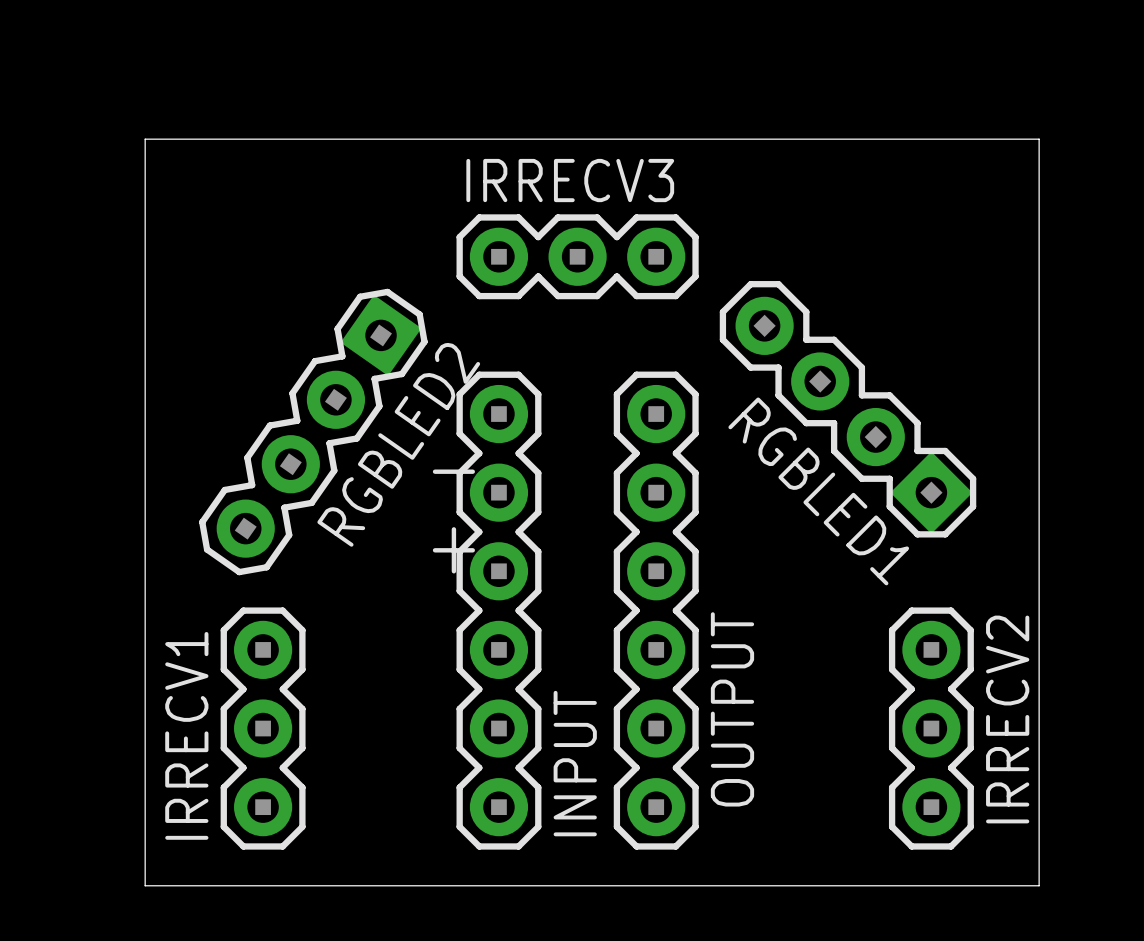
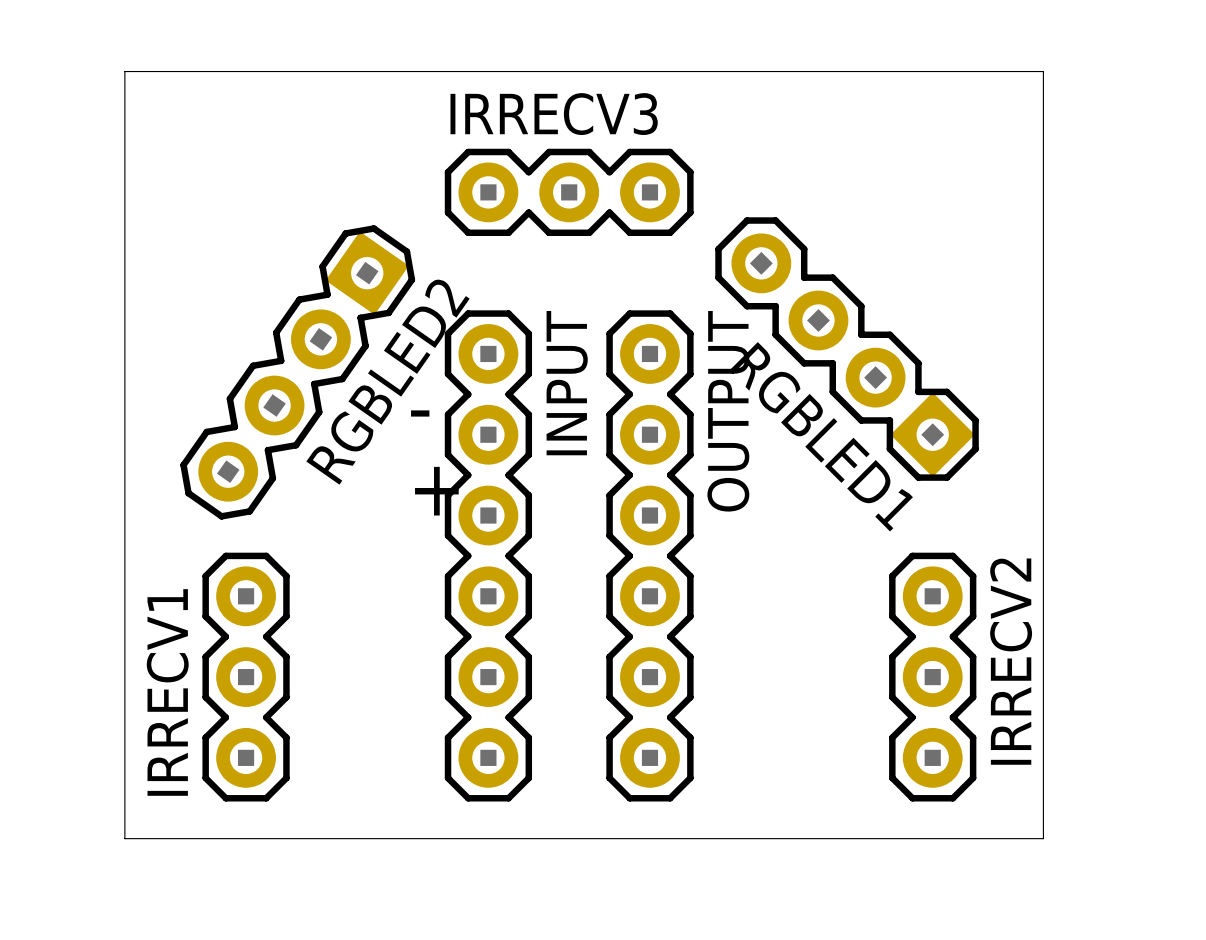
OUTPUT name position: OUTPUT (732, 709) -> OUTPUT (728, 411)
INPUT name position: INPUT (575, 763) -> INPUT (567, 383)

